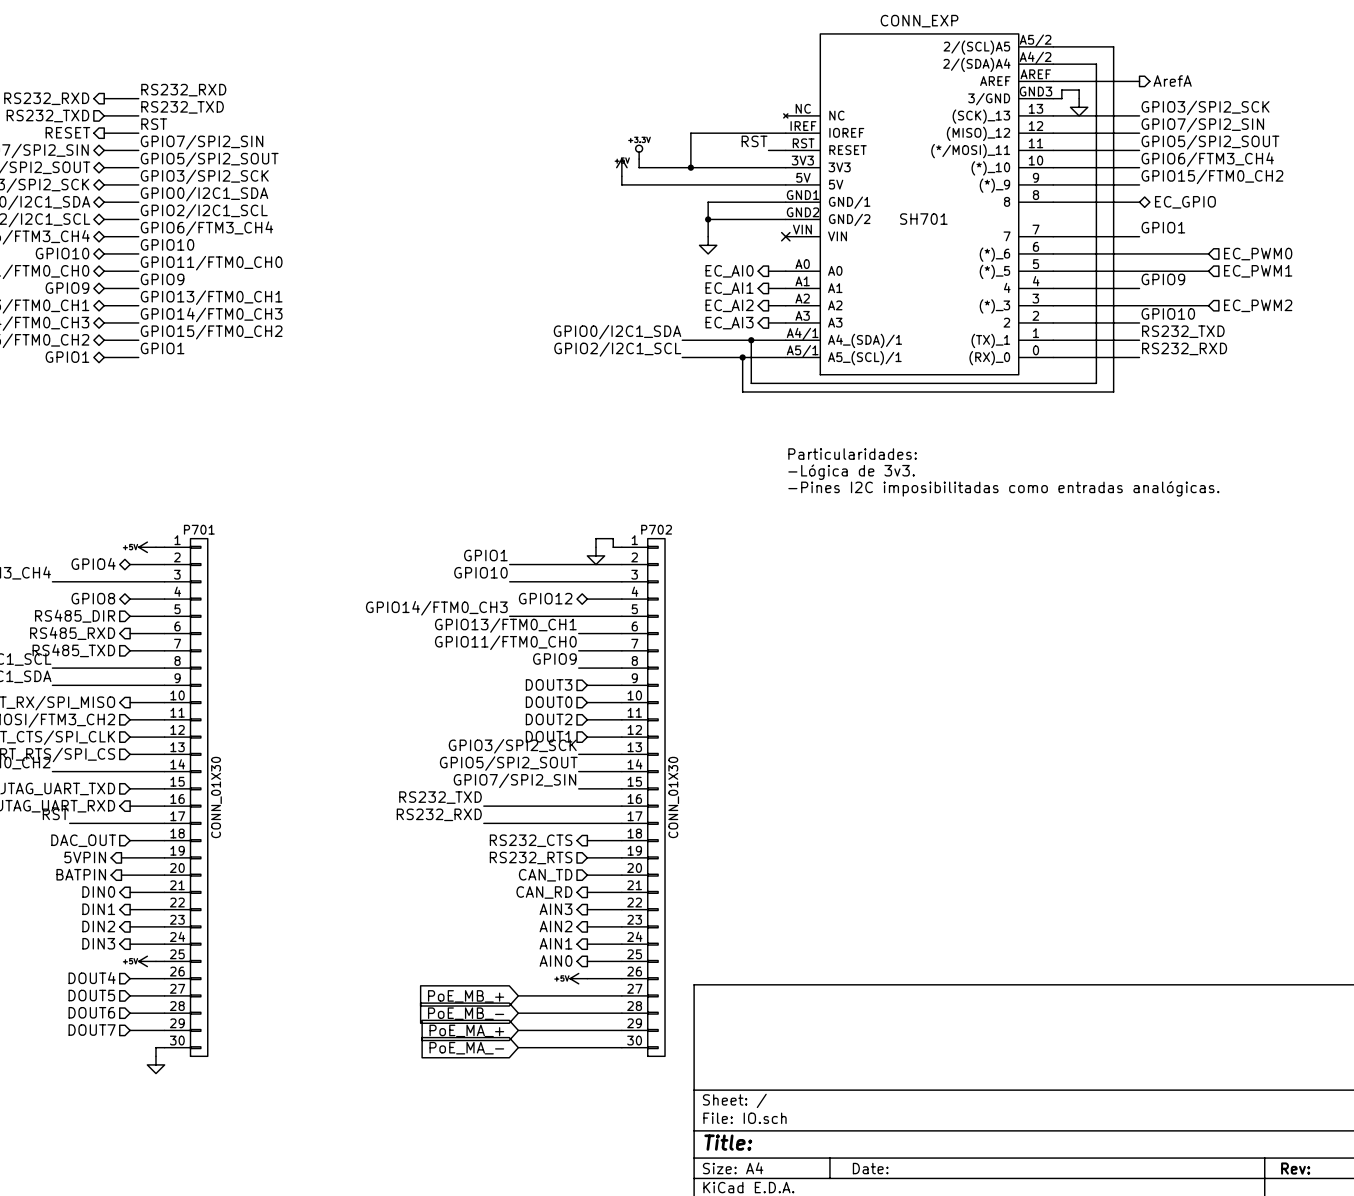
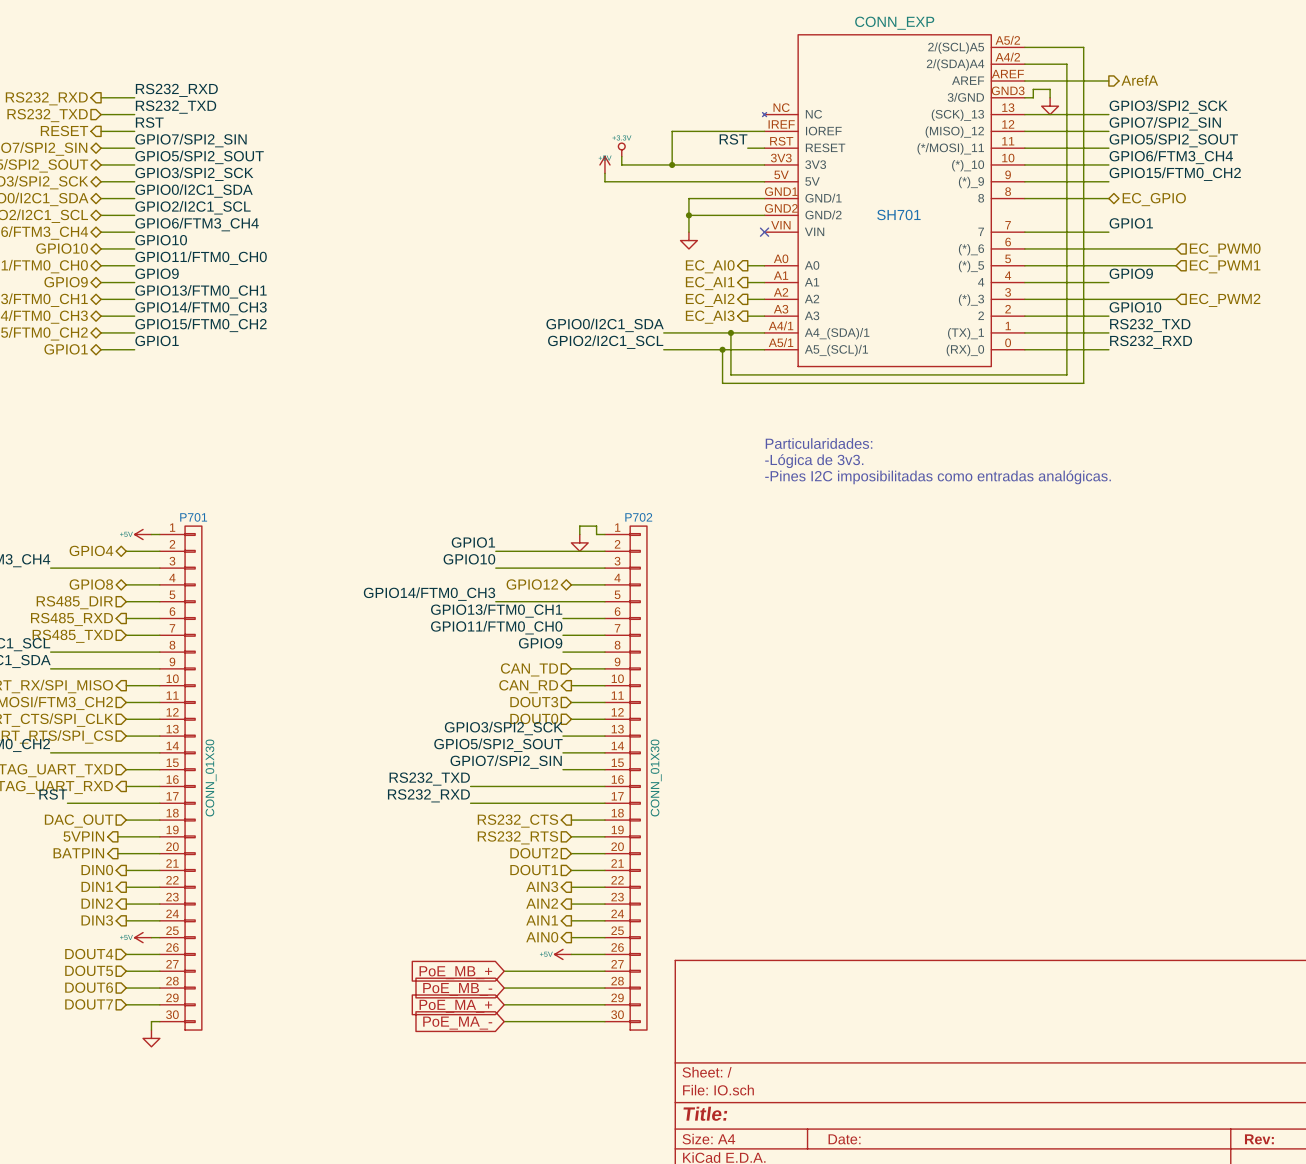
hierarchical label: DOUT3 (549, 684) -> CAN_TD (529, 669)
hierarchical label shape: input (549, 702) -> output (528, 686)
hierarchical label: DOUT0 (549, 702) -> CAN_RD (528, 686)
hierarchical label: DOUT2 (549, 719) -> DOUT3 (534, 702)
hierarchical label: DOUT1 (549, 736) -> DOUT0 (534, 718)
hierarchical label: CAN_TD (545, 875) -> DOUT2 (534, 853)
hierarchical label shape: output (544, 892) -> input (534, 870)
hierarchical label: CAN_RD (544, 892) -> DOUT1 (534, 870)

